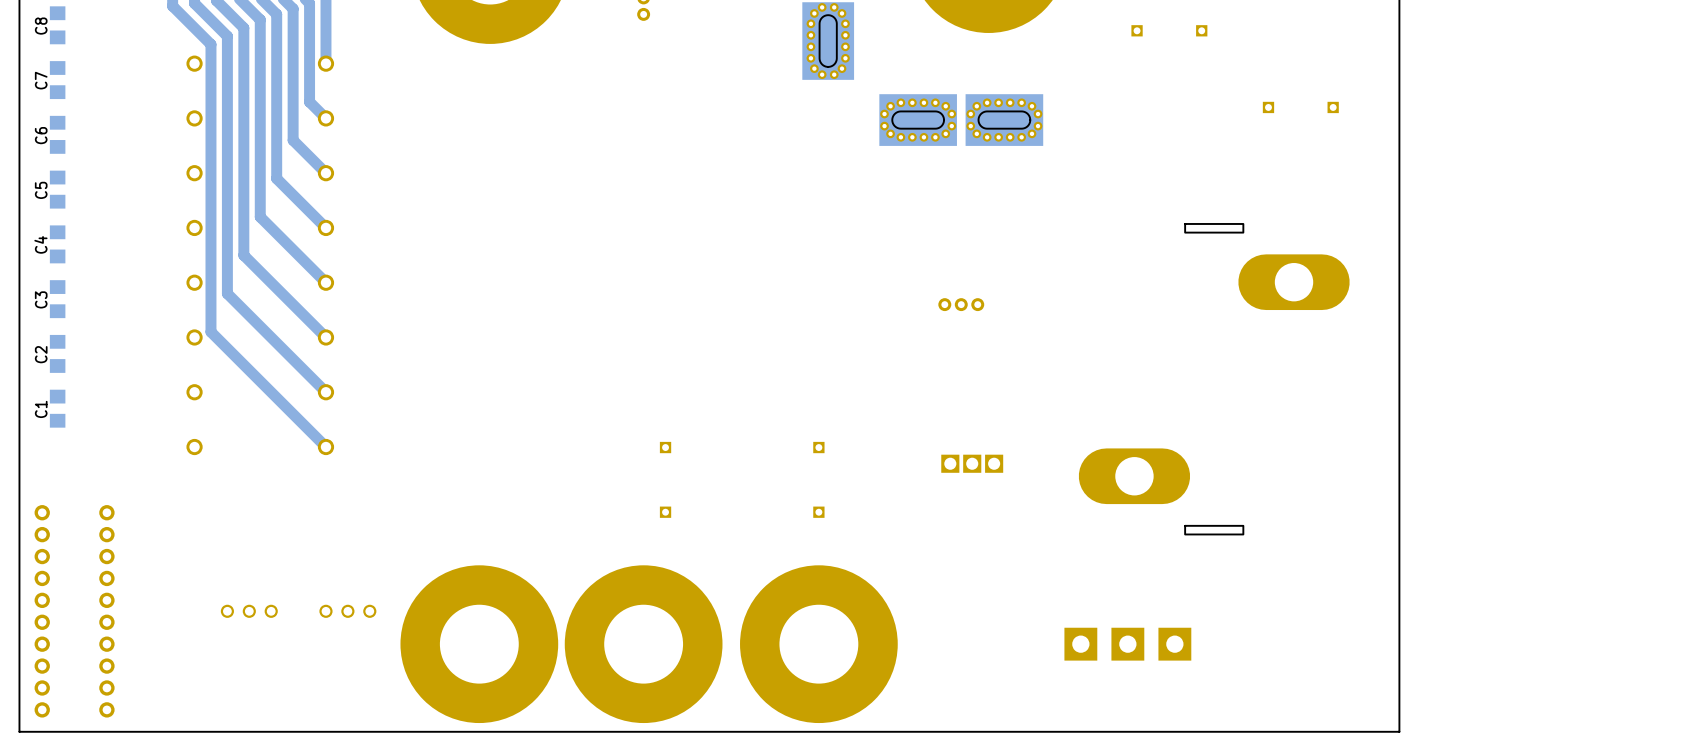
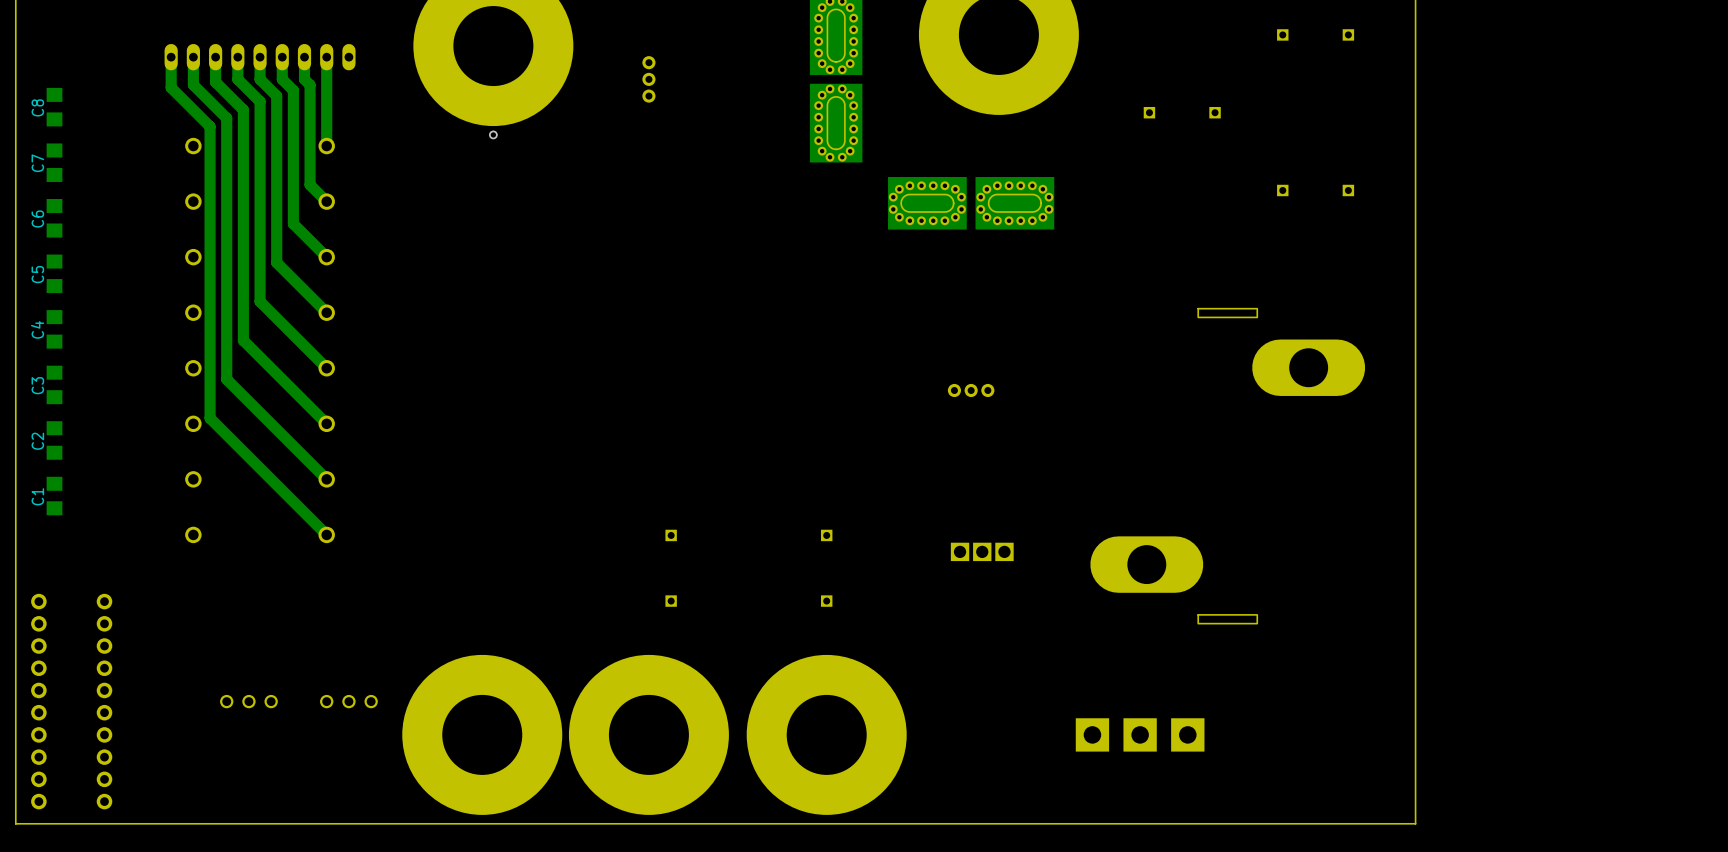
via: none -> (493, 134)

